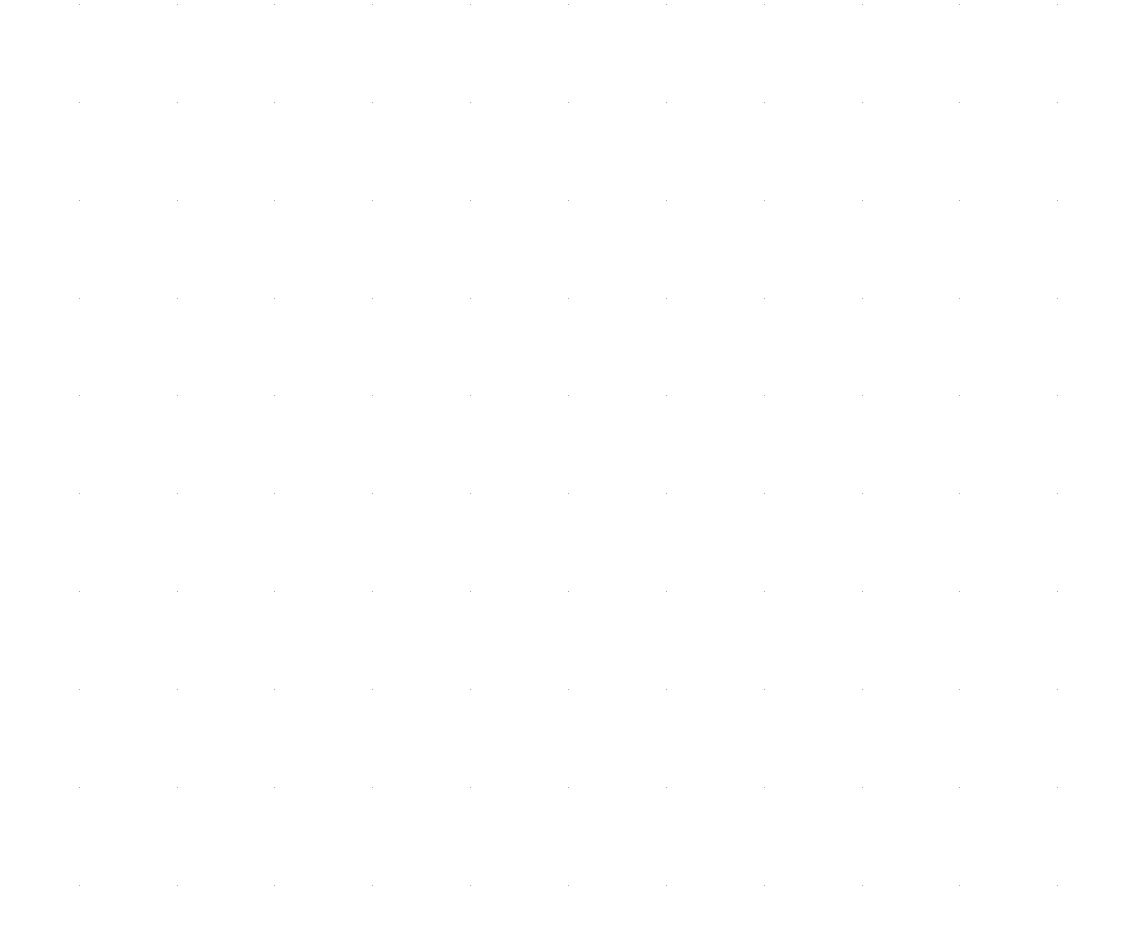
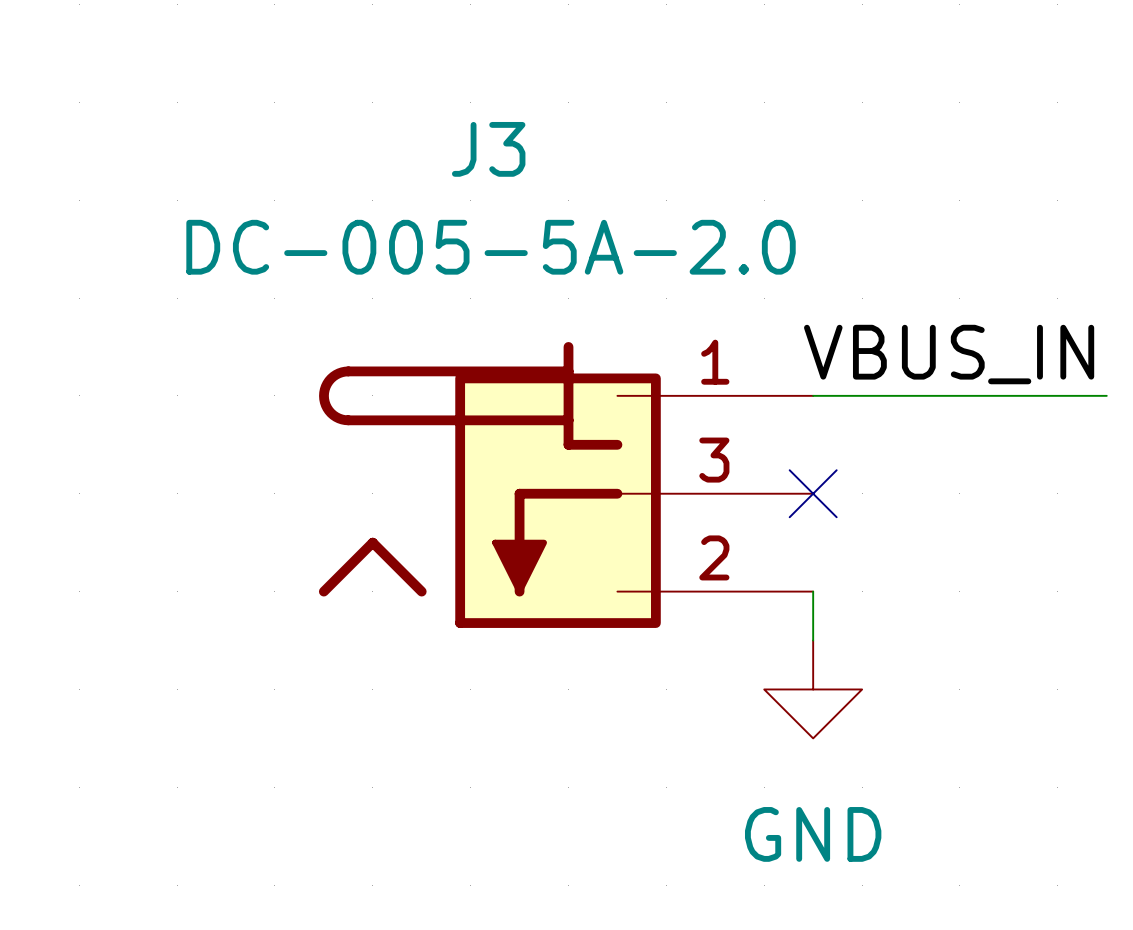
label: none -> VBUS_IN (949, 354)
wire: none -> (813, 395) (1106, 395)
J3: none -> DC-005-5A-2.0 (566, 484)
no-connect mark: none -> (813, 493)
wire: none -> (813, 591) (813, 640)
power symbol: none -> GND (813, 689)

